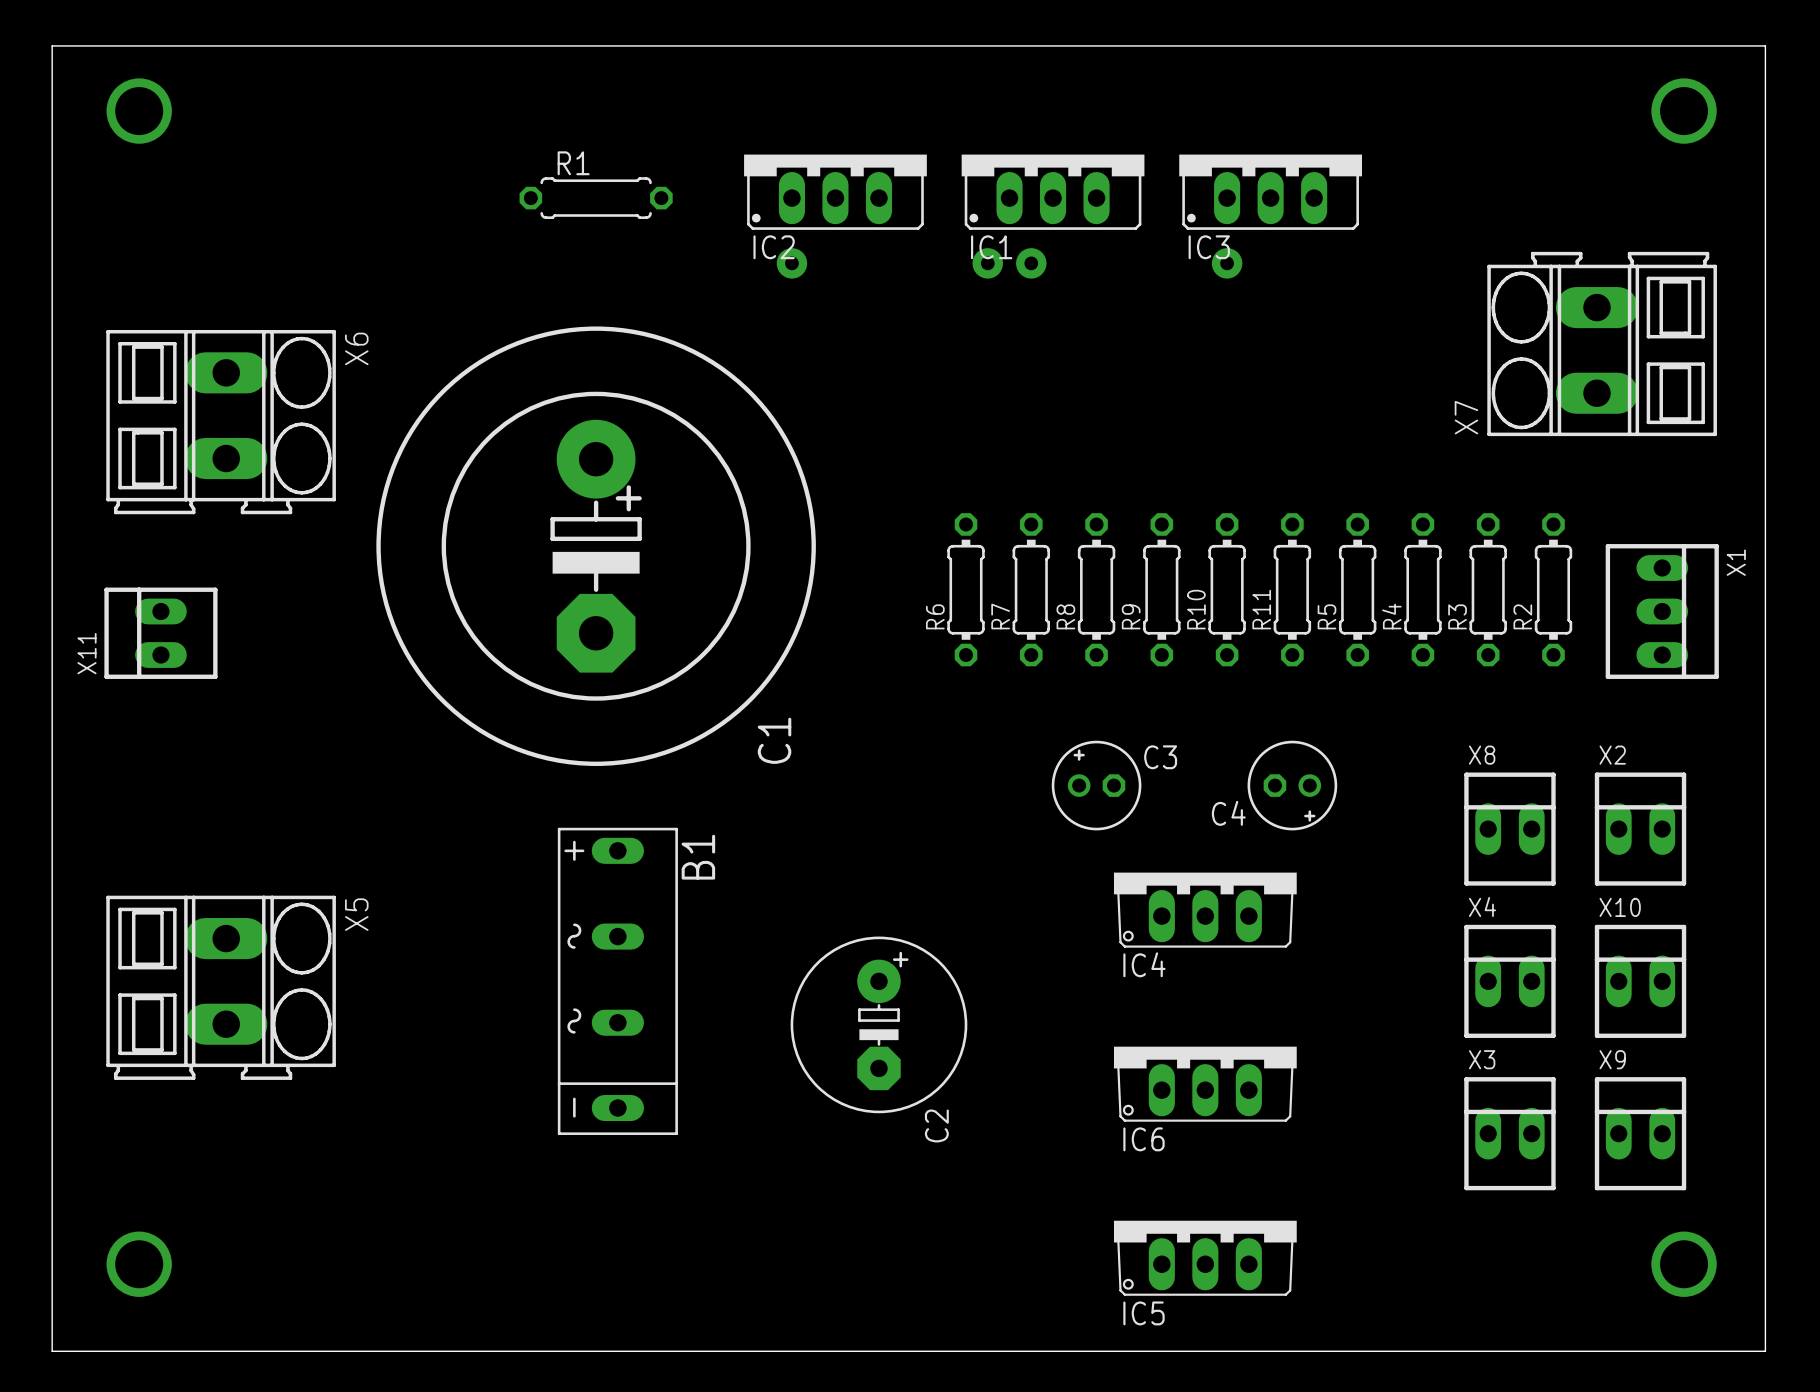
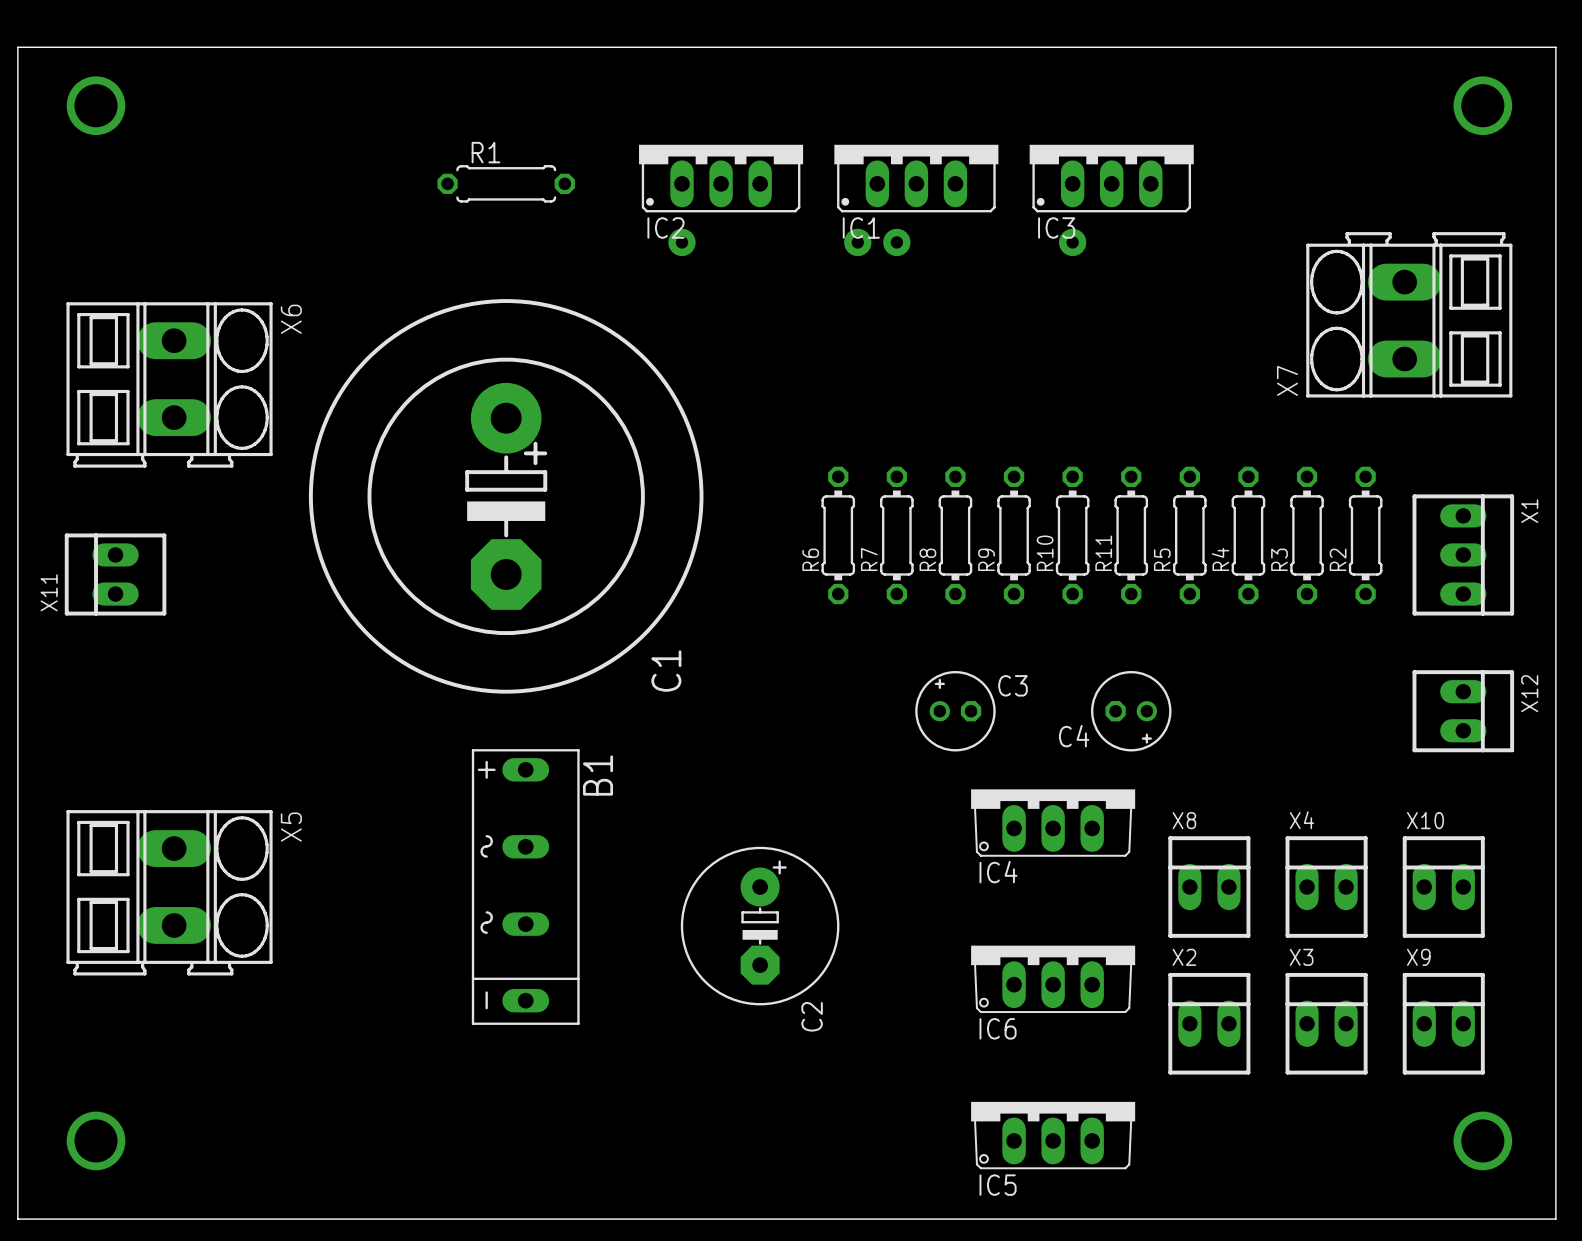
X12: none -> (1463, 711)
X8 position: (1509, 829) -> (1209, 887)
X2 position: (1640, 829) -> (1209, 1023)

